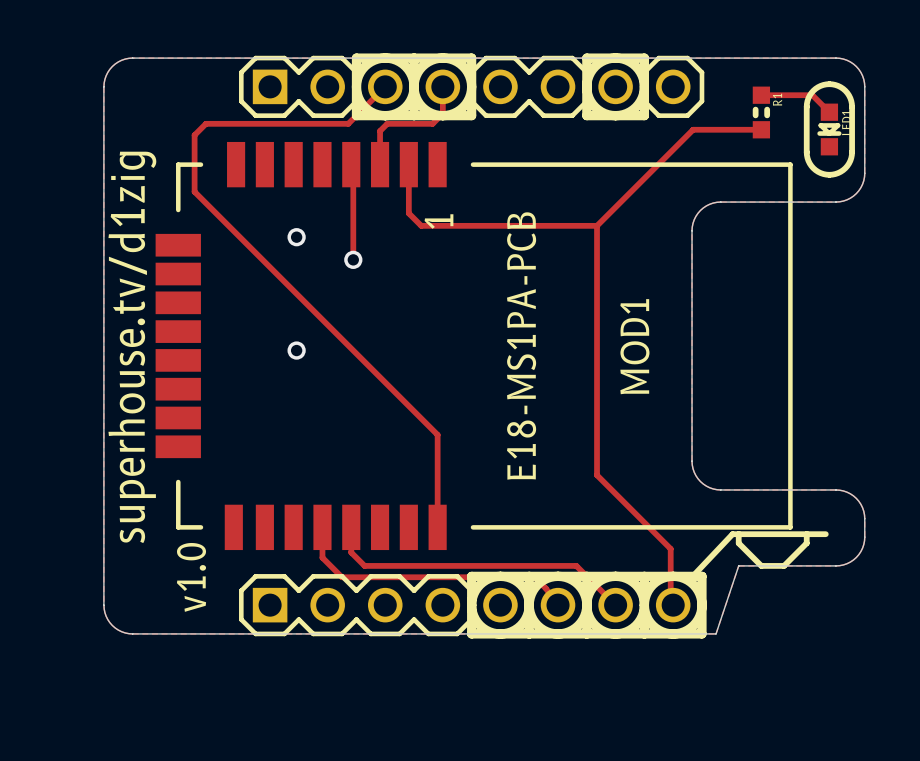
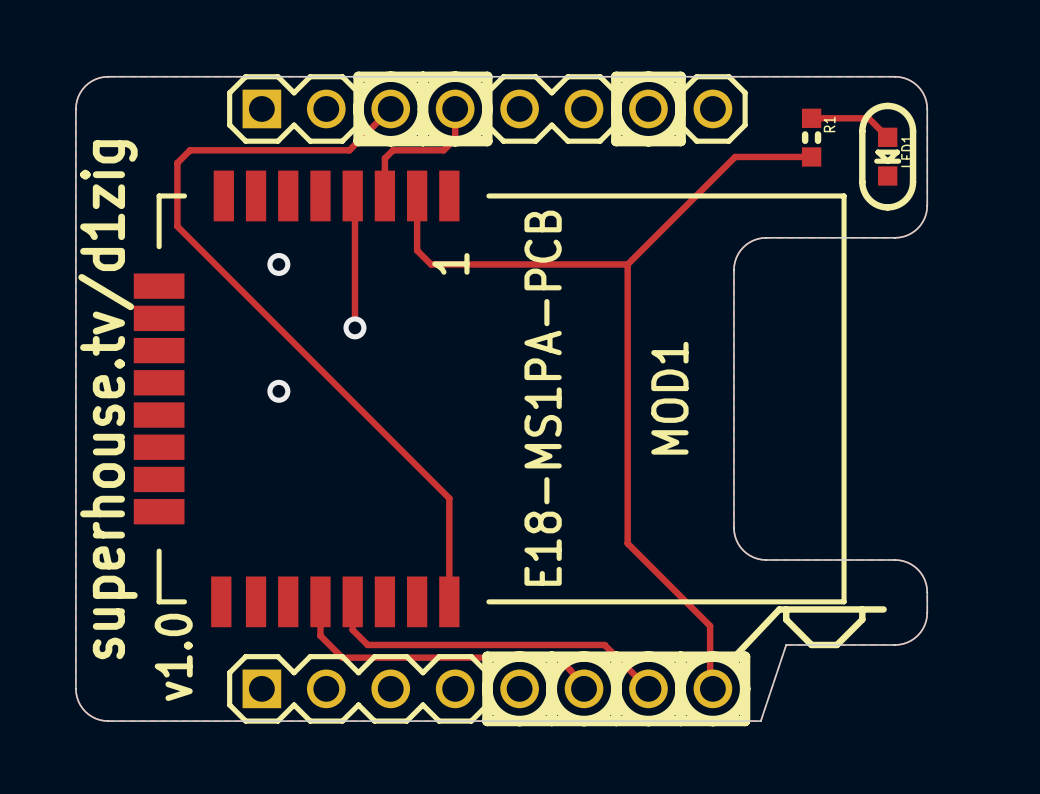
via position: (296, 237) -> (278, 264)
track: none -> (354, 302) (354, 327)
via: (353, 259) -> none
via: none -> (354, 327)
via position: (296, 350) -> (278, 391)

